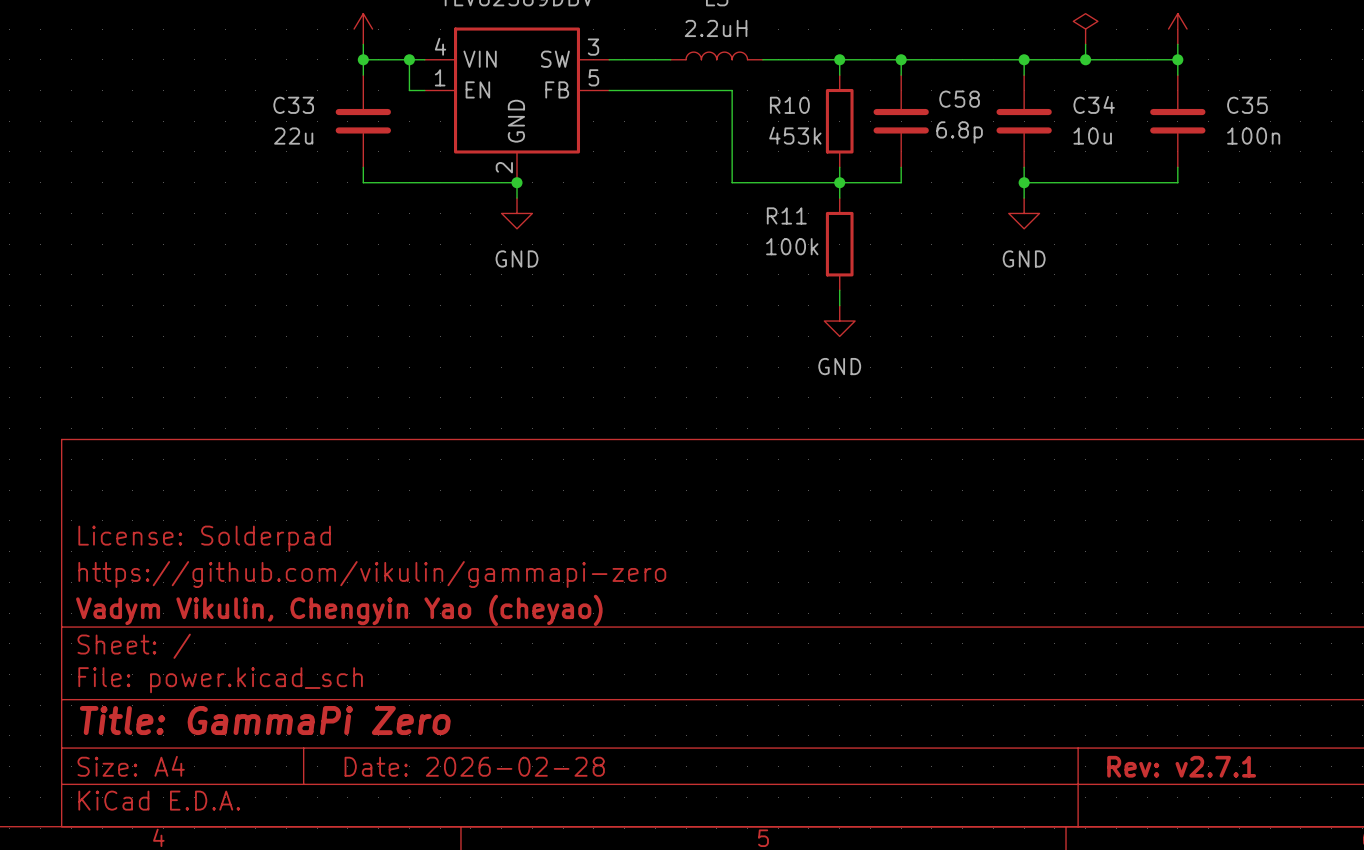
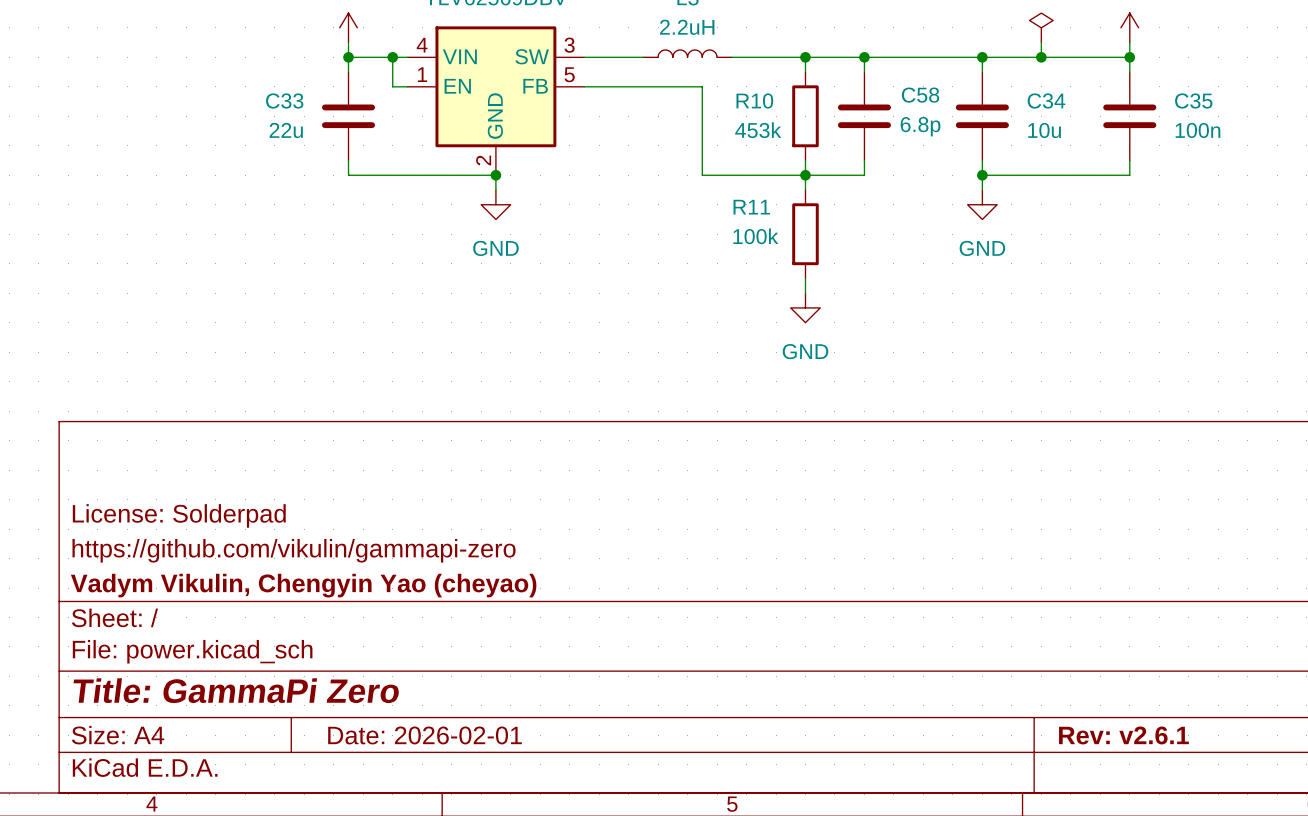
title block: Date: 2026-02-28 (474, 766) -> Date: 2026-02-01 (425, 735)
title block: Rev: v2.7.1 (1181, 766) -> Rev: v2.6.1 (1123, 735)

